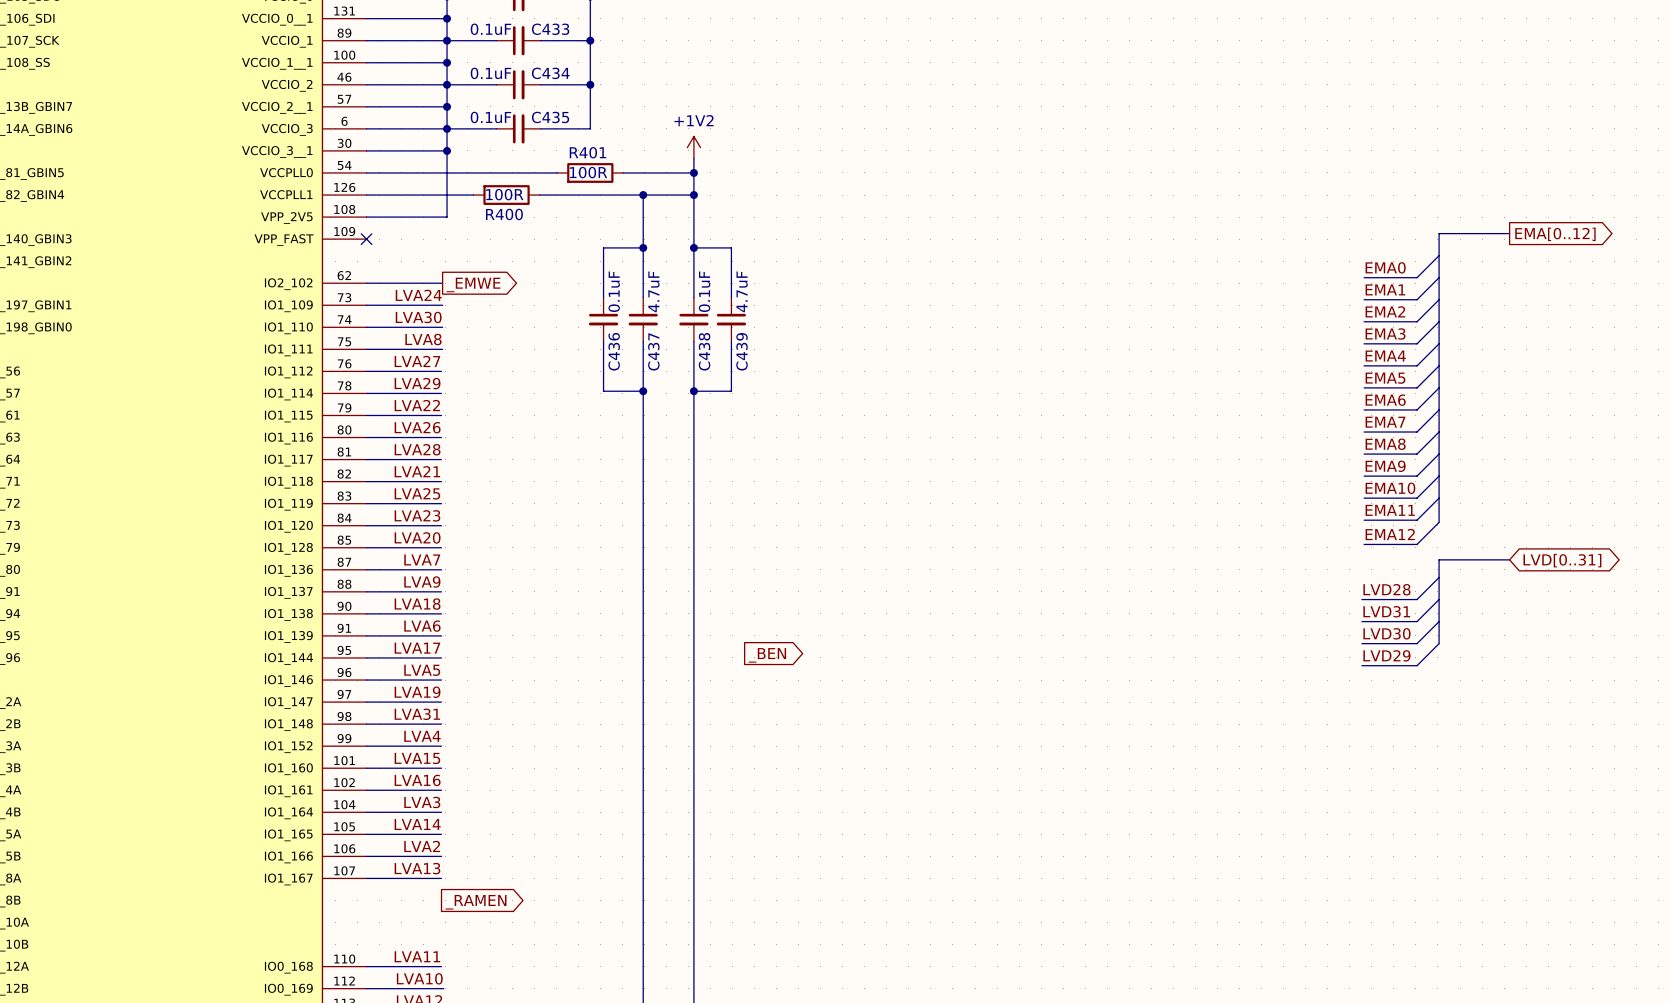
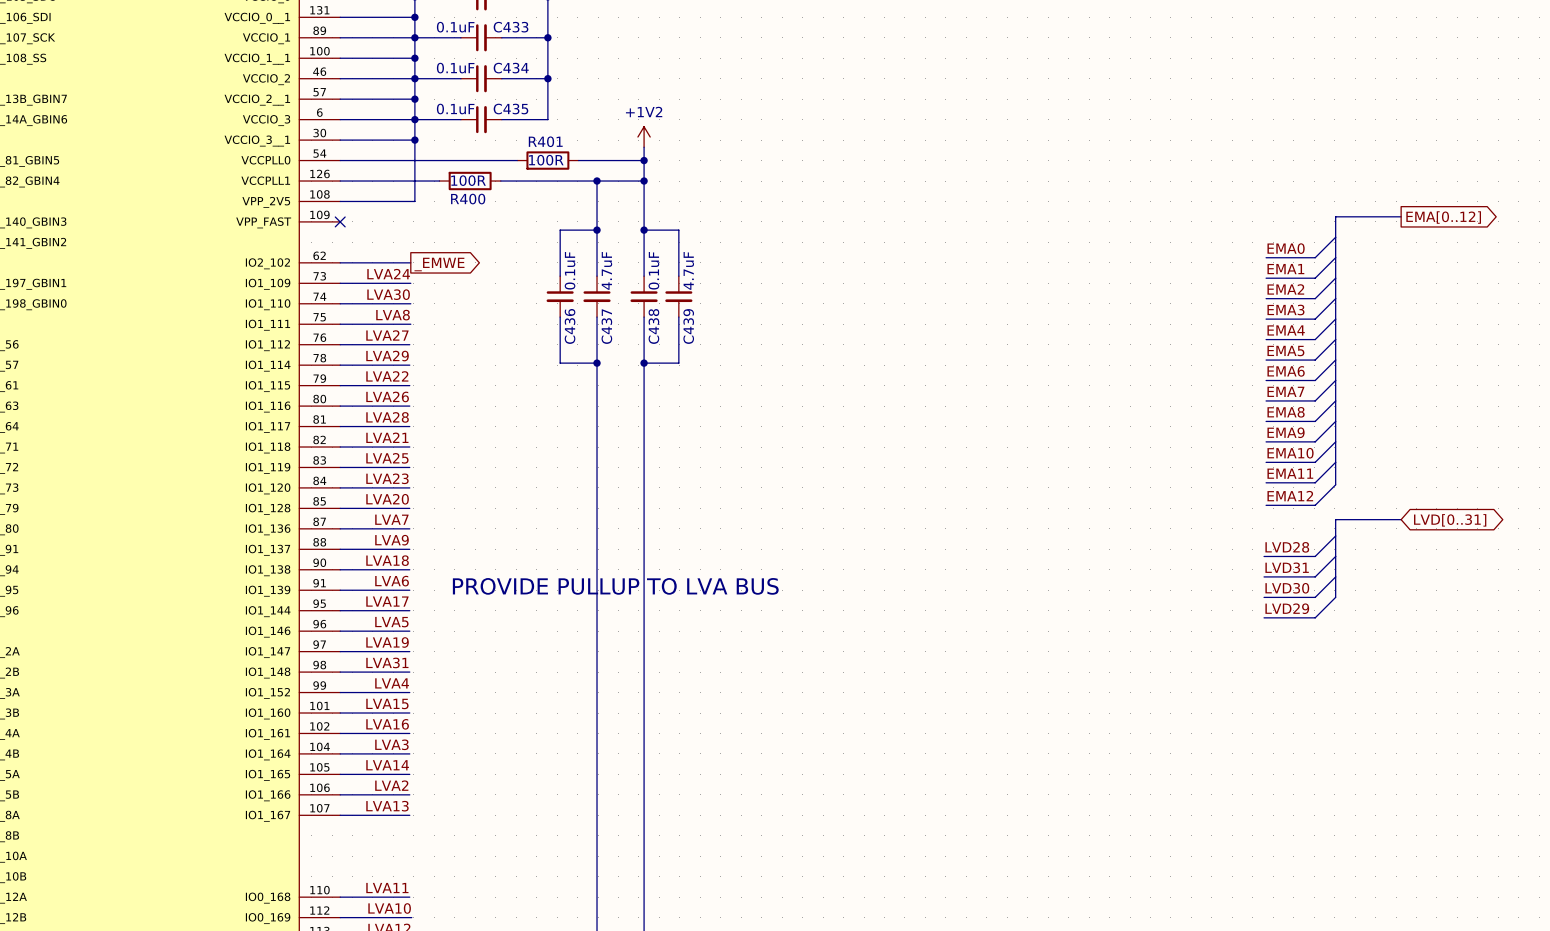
text: none -> PROVIDE PULLUP TO LVA BUS (615, 586)
global label: _BEN (767, 655) -> none
global label: _RAMEN (475, 902) -> none

